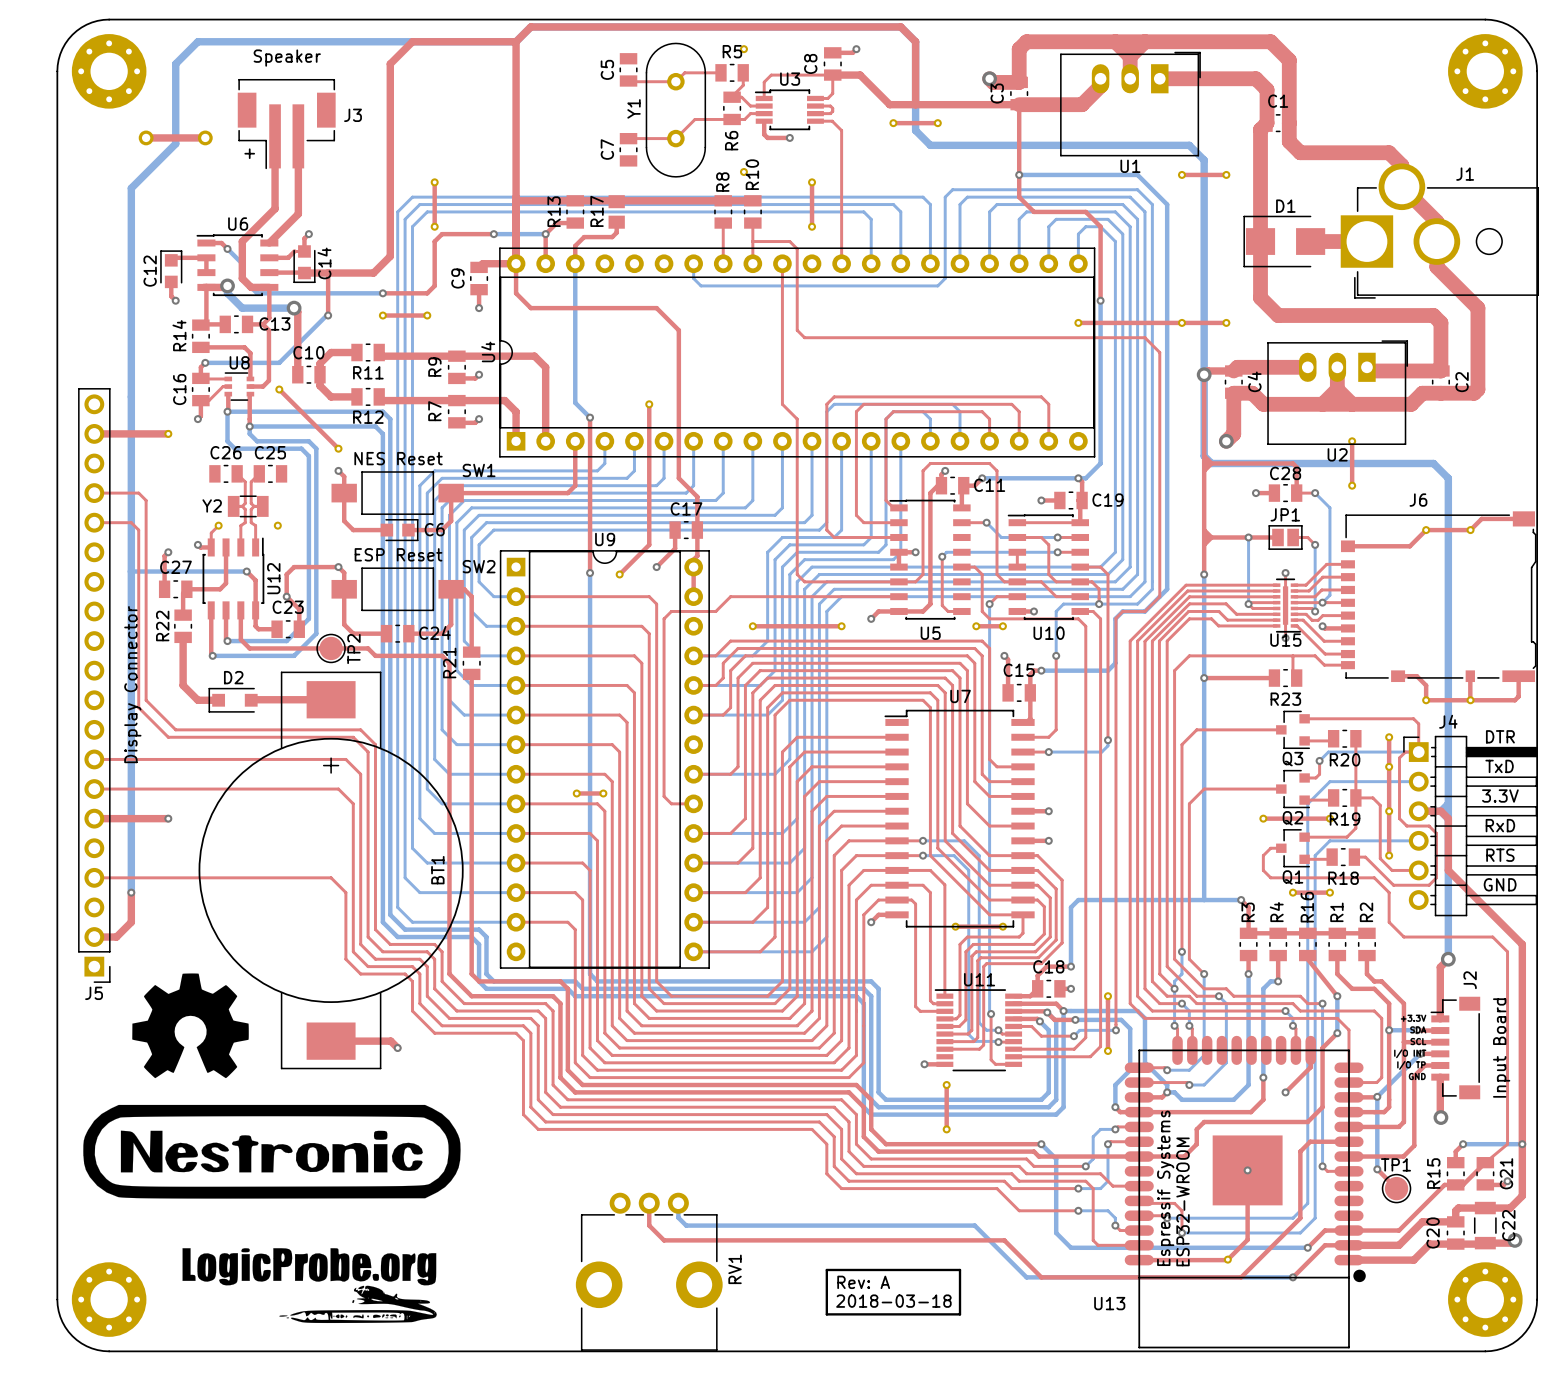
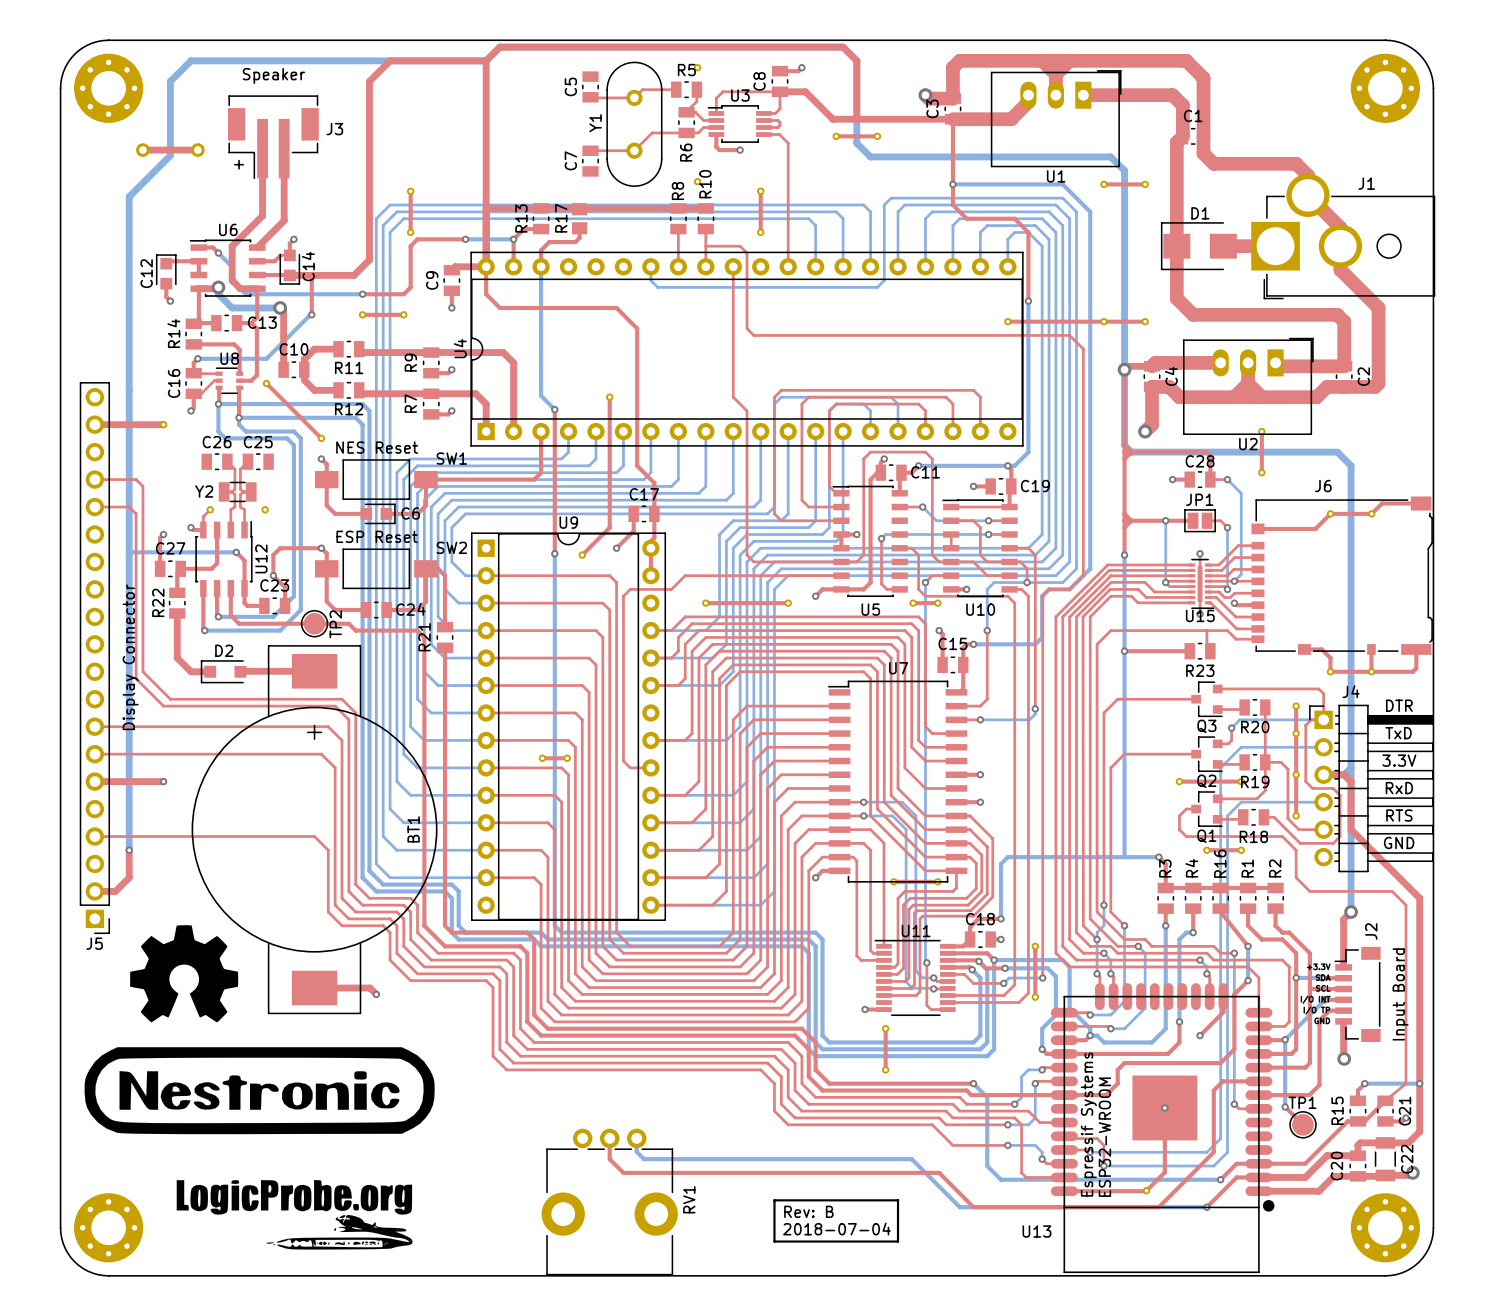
text: Rev: A (863, 1282) -> Rev: B (808, 1211)
text: 2018-03-18 (893, 1301) -> 2018-07-04 (836, 1228)

